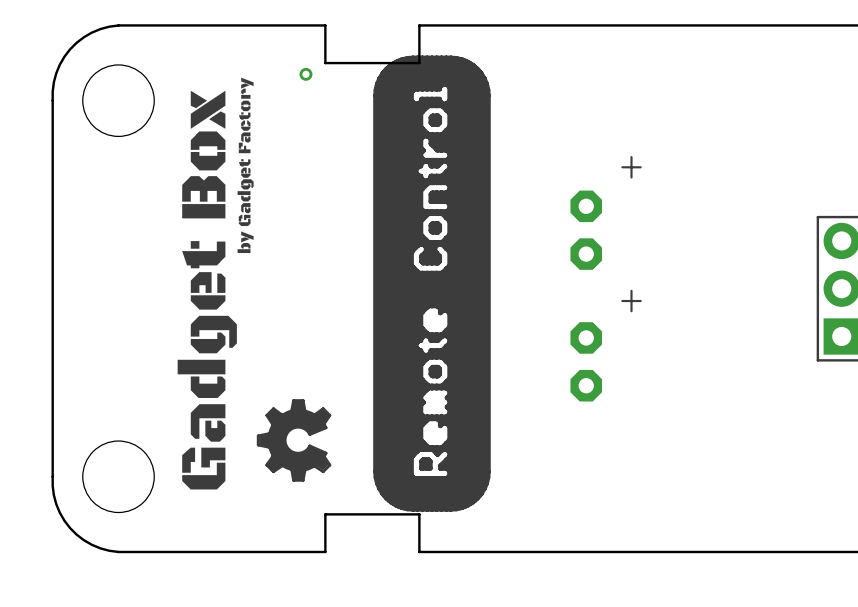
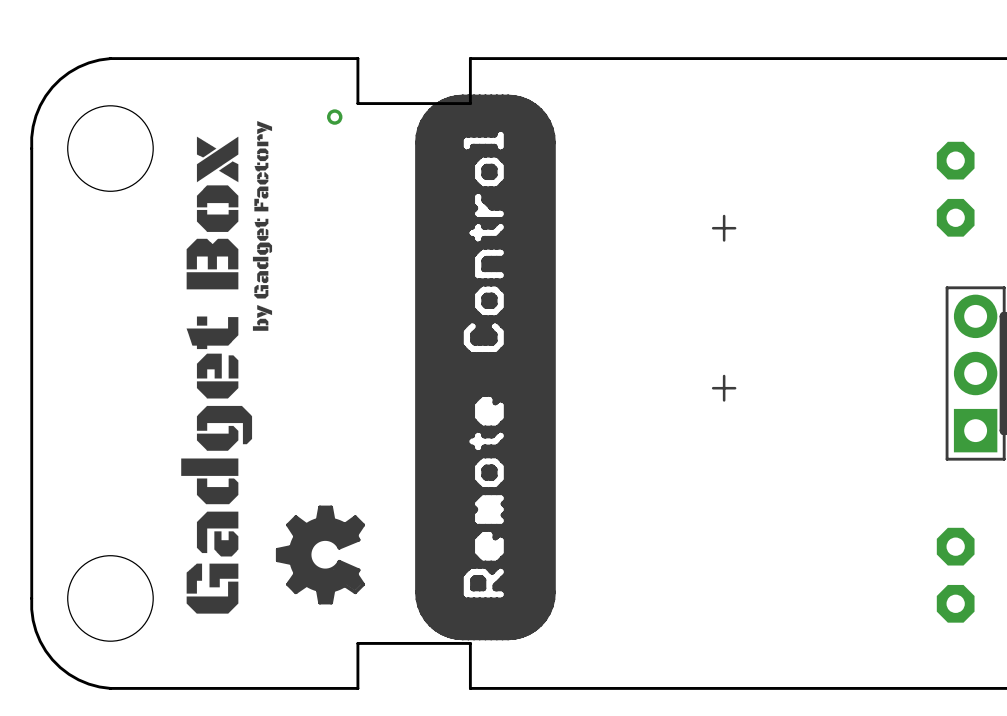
part: none -> (955, 189)
part: (586, 230) -> none
part: (586, 361) -> none
part: none -> (955, 575)

